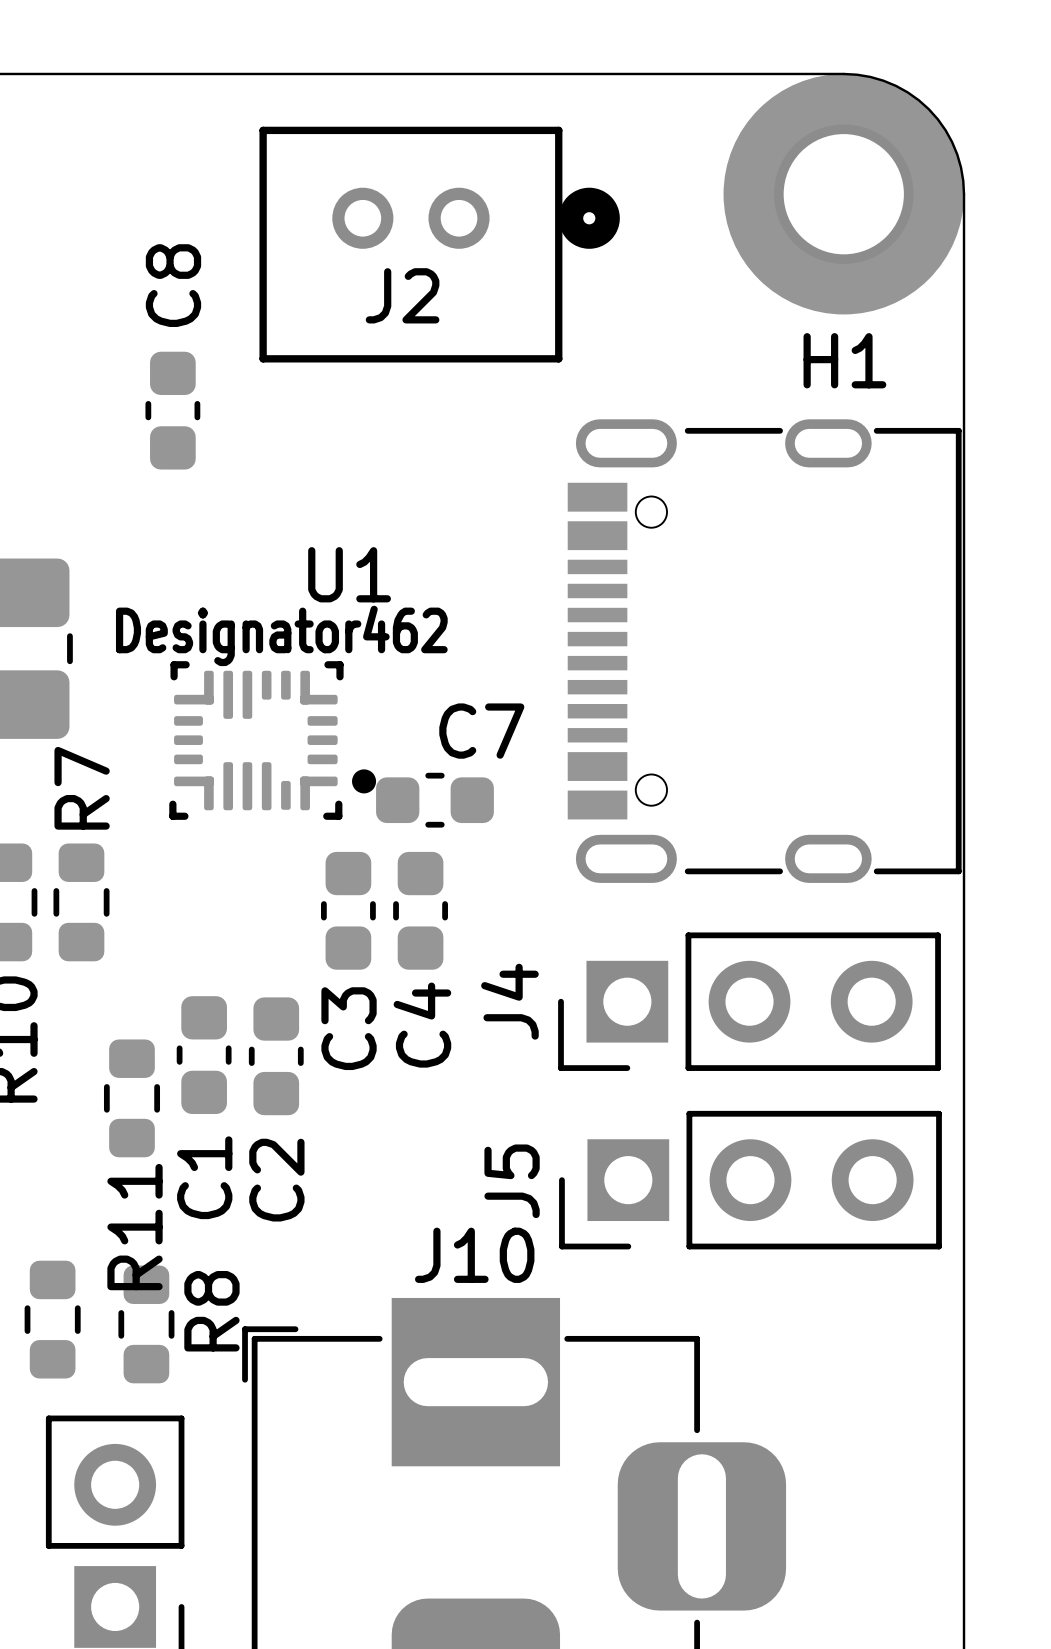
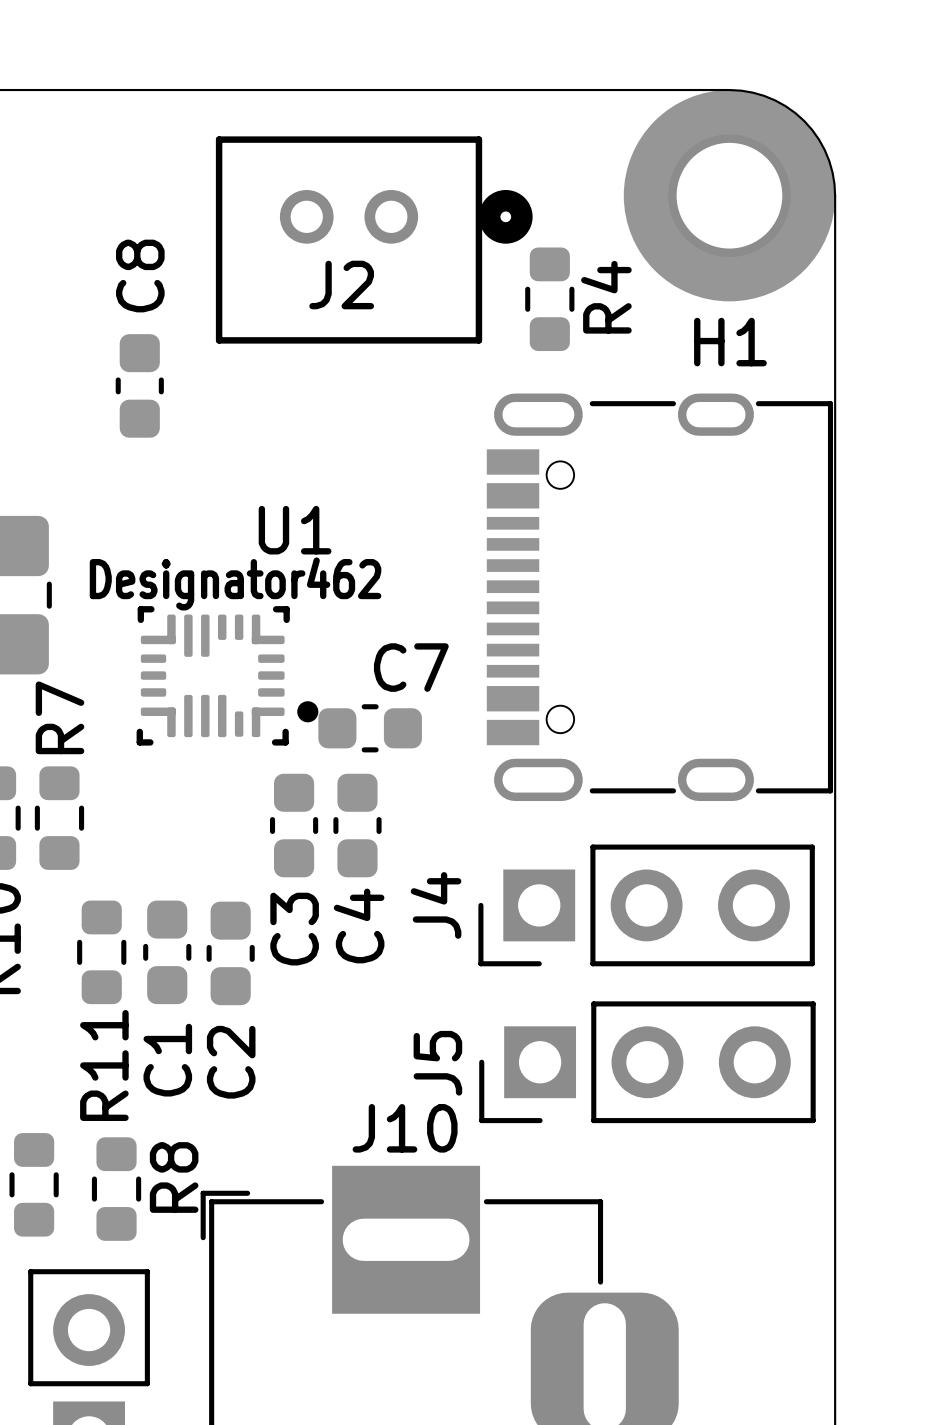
R4: none -> (549, 299)
R11 position: (131, 1098) -> (101, 952)

